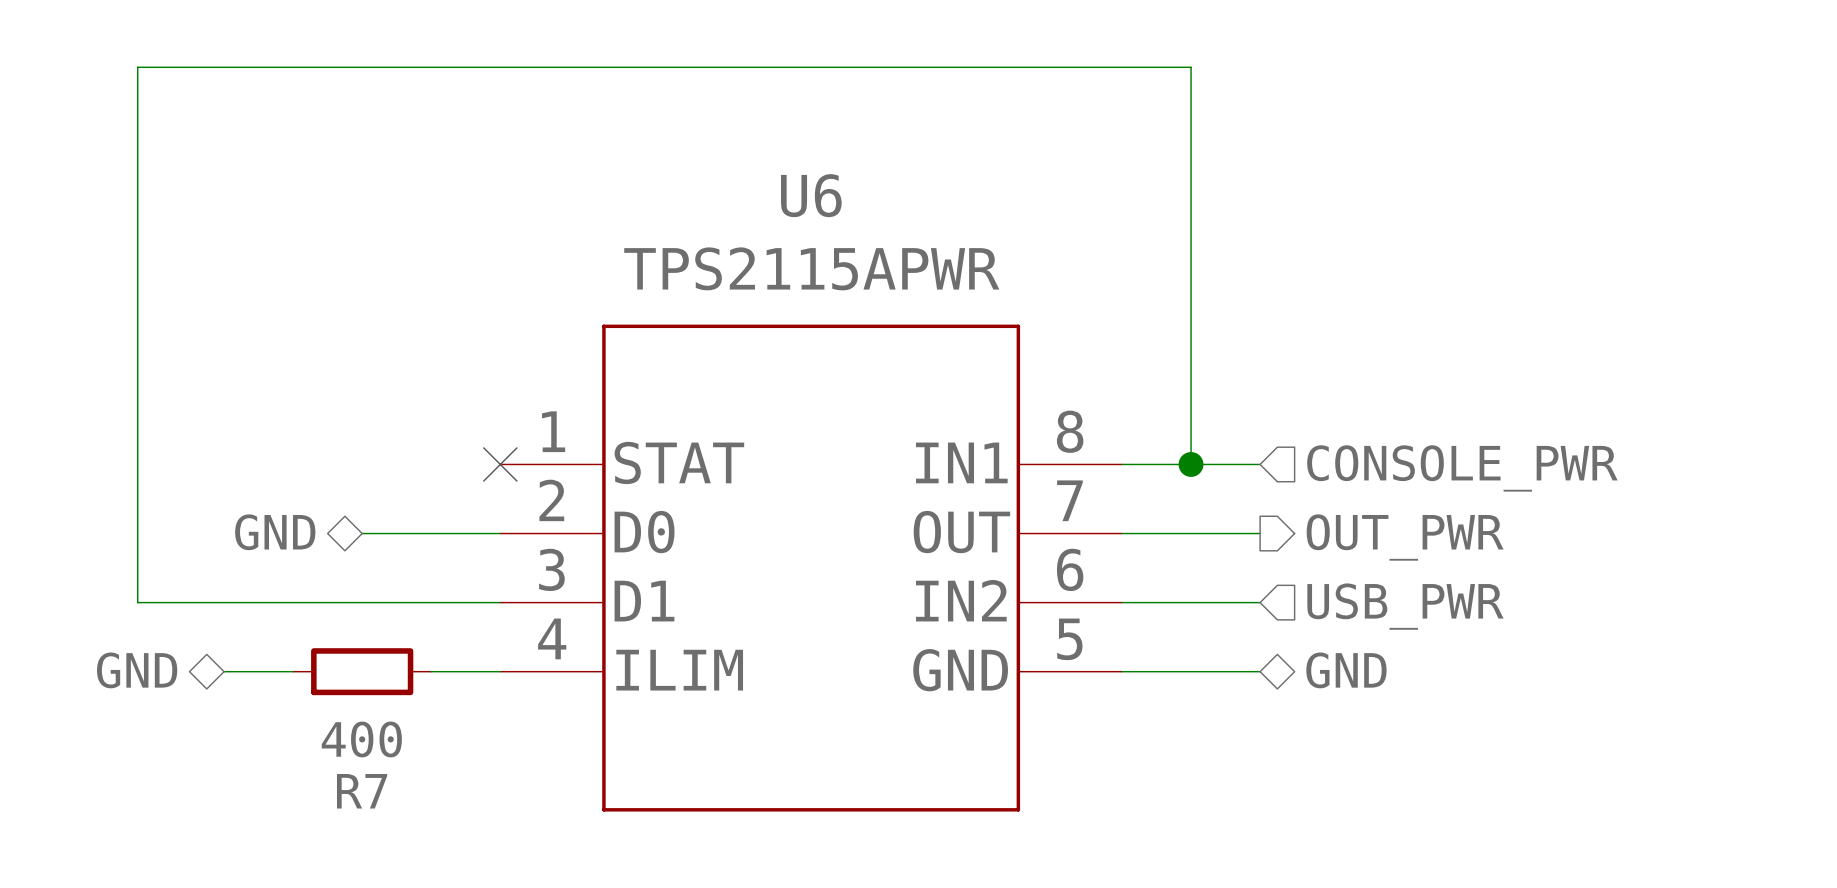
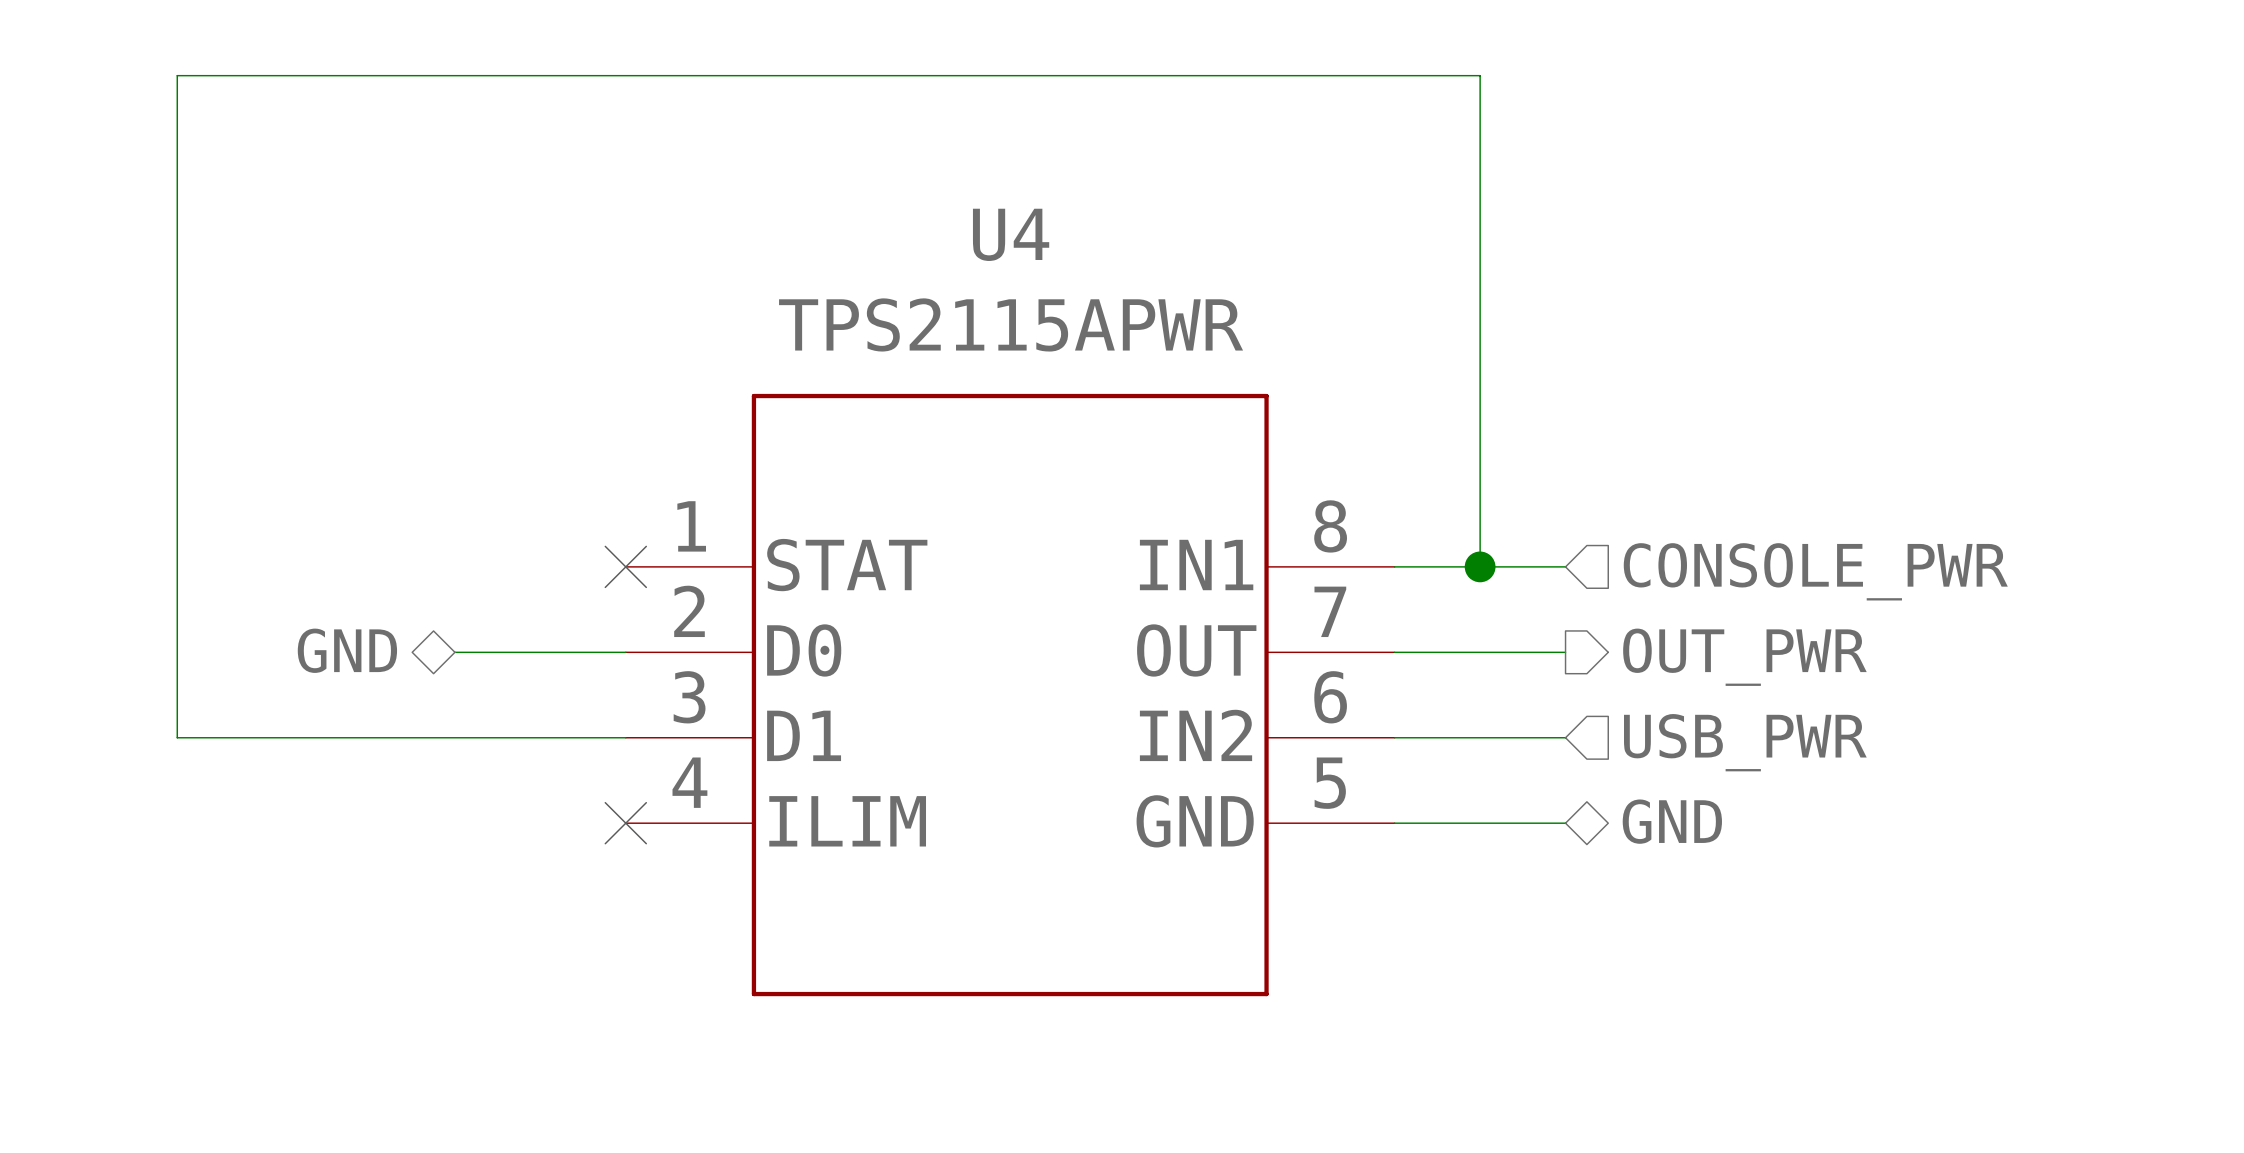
U6 name: U6 (811, 195) -> U4 (1011, 234)
hierarchical label: GND (137, 670) -> none
wire: (224, 671) (293, 671) -> none
R7: 400 (362, 671) -> none
wire: (431, 671) (500, 671) -> none
no-connect mark: none -> (625, 823)

